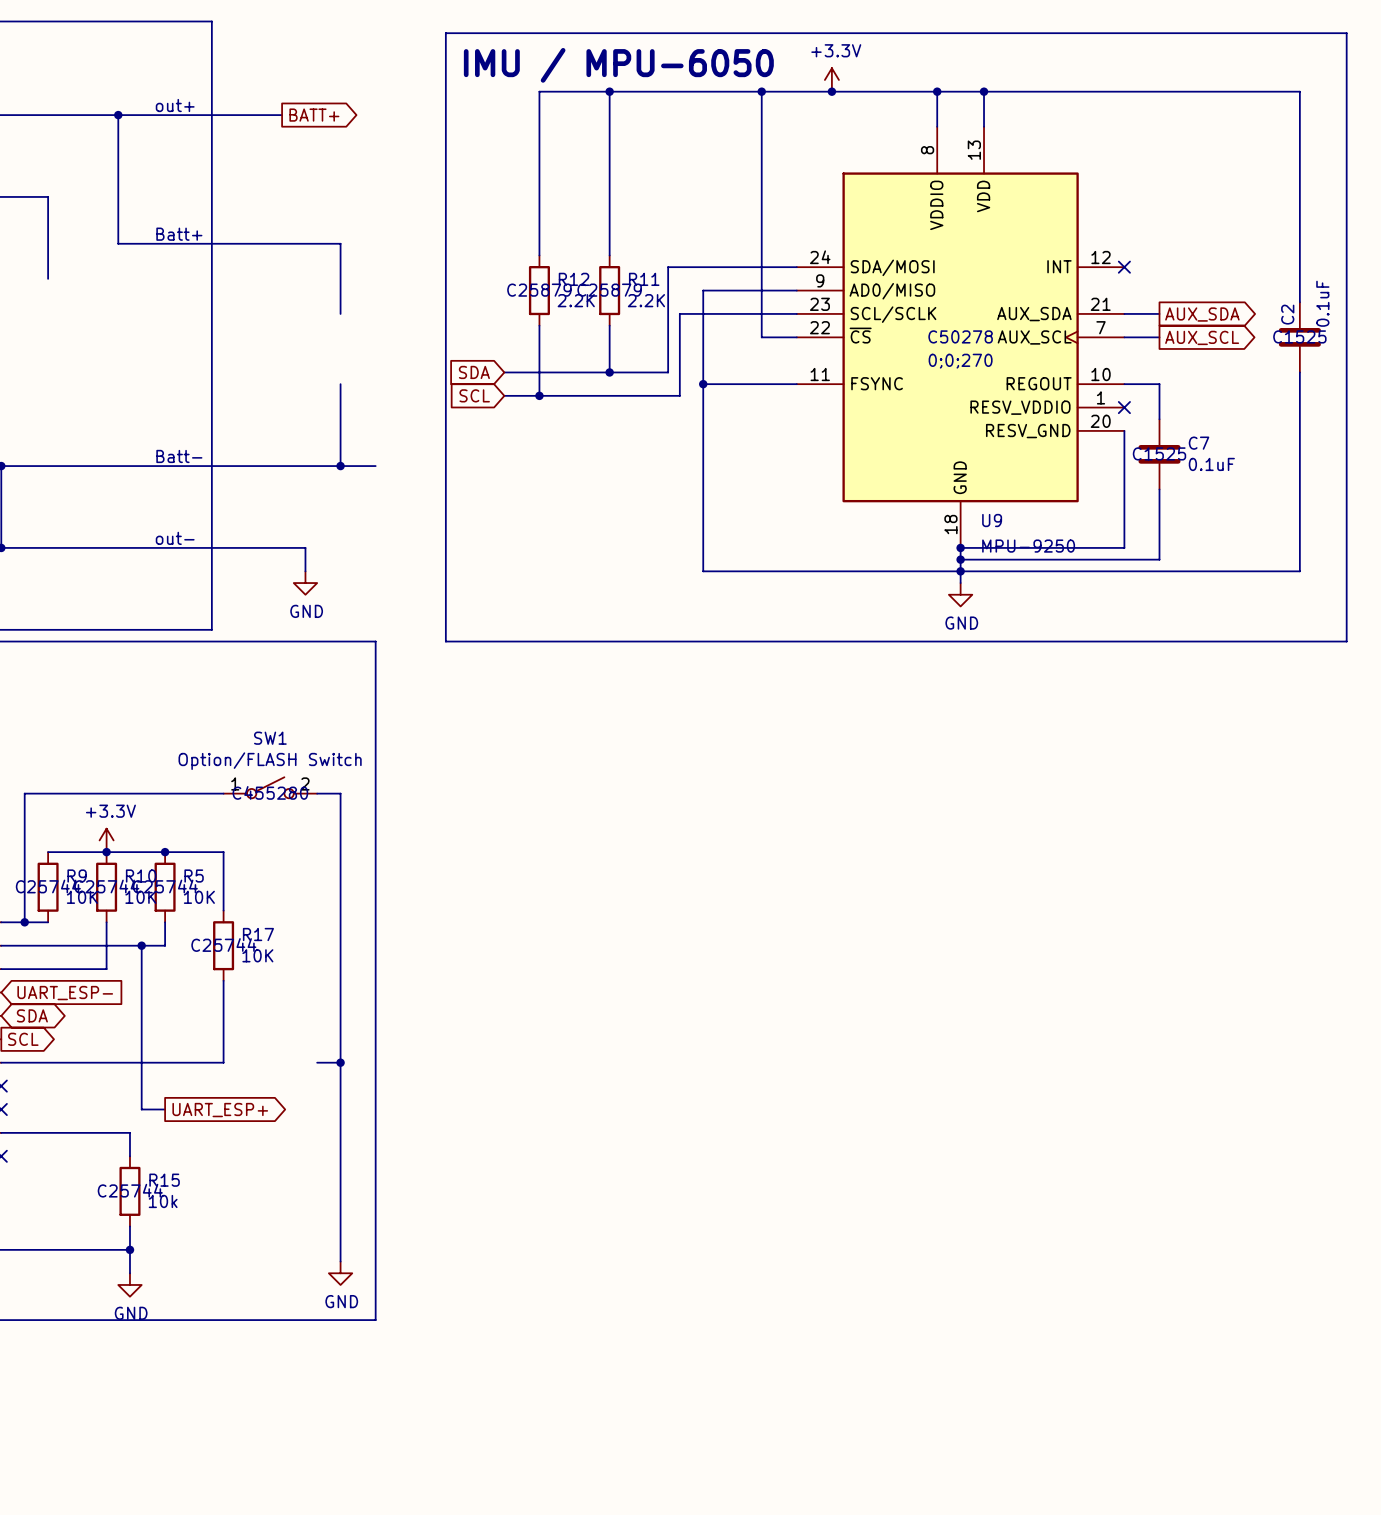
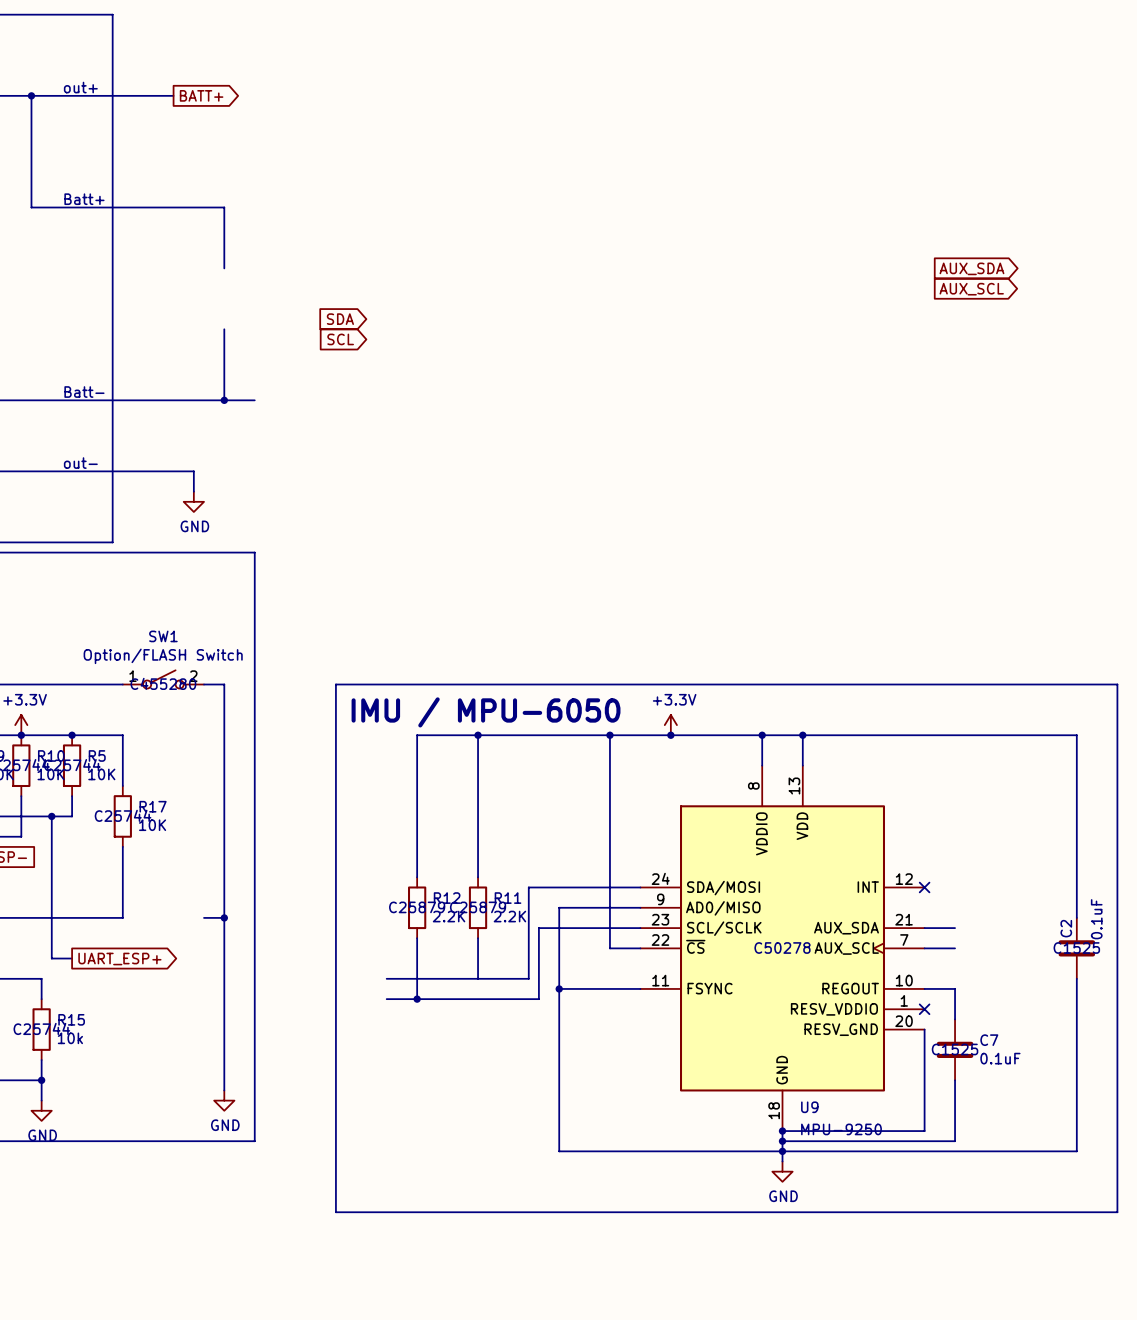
line: (445, 33) (1346, 33) (1346, 641) (445, 641) (445, 33) -> none
text: IMU / MPU-6050 (618, 65) -> none
power symbol: +3.3V (831, 79) -> none
wire: (609, 91) (609, 255) -> none
junction: (609, 91) -> none
wire: (761, 91) (761, 337) (796, 337) -> none
junction: (761, 91) -> none
junction: (831, 91) -> none
wire: (937, 91) (937, 126) -> none
junction: (937, 91) -> none
wire: (984, 91) (984, 126) -> none
junction: (984, 91) -> none
wire: (539, 255) (539, 91) (1299, 91) (1299, 302) -> none
wire: (796, 267) (668, 267) (668, 372) (504, 372) -> none
no-connect mark: (1124, 267) -> none
R12 position: (539, 290) -> (417, 907)
R11 position: (609, 290) -> (478, 907)
wire: (796, 290) (703, 290) (703, 571) (1299, 571) (1299, 372) -> none
wire: (796, 313) (679, 313) (679, 395) (504, 395) -> none
wire: (1124, 313) (1159, 313) -> none
wire: (539, 325) (539, 395) -> none
wire: (609, 325) (609, 372) -> none
U9 position: (960, 337) -> (782, 948)
wire: (1124, 337) (1159, 337) -> none
C2 position: (1299, 337) -> (1076, 948)
U9 text: 0;0;270 (960, 361) -> none
junction: (609, 372) -> none
wire: (703, 384) (796, 384) -> none
junction: (703, 384) -> none
wire: (1124, 384) (1159, 384) (1159, 419) -> none
junction: (539, 395) -> none
no-connect mark: (1124, 407) -> none
wire: (1124, 430) (1124, 547) (960, 547) (960, 583) -> none
C7 position: (1159, 454) -> (955, 1049)
wire: (1159, 489) (1159, 559) (960, 559) -> none
junction: (960, 547) -> none
junction: (960, 559) -> none
junction: (960, 571) -> none
power symbol: GND (960, 594) -> none
line: none -> (335, 684) (1117, 684) (1117, 1212) (335, 1212) (335, 684)
text: none -> IMU / MPU-6050 (486, 712)
power symbol: none -> +3.3V (670, 725)
wire: none -> (478, 735) (478, 877)
junction: none -> (478, 735)
wire: none -> (609, 735) (609, 948) (640, 948)
junction: none -> (609, 735)
junction: none -> (670, 735)
wire: none -> (762, 735) (762, 765)
junction: none -> (762, 735)
wire: none -> (802, 735) (802, 765)
junction: none -> (802, 735)
wire: none -> (417, 877) (417, 735) (1076, 735) (1076, 917)
wire: none -> (640, 887) (528, 887) (528, 978) (386, 978)
no-connect mark: none -> (924, 887)
wire: none -> (640, 907) (559, 907) (559, 1151) (1076, 1151) (1076, 978)
wire: none -> (640, 928) (538, 928) (538, 999) (386, 999)
wire: none -> (924, 928) (955, 928)
wire: none -> (417, 938) (417, 999)
wire: none -> (478, 938) (478, 978)
wire: none -> (924, 948) (955, 948)
wire: none -> (559, 988) (640, 988)
junction: none -> (559, 988)
wire: none -> (924, 988) (955, 988) (955, 1019)
junction: none -> (417, 999)
no-connect mark: none -> (924, 1009)
wire: none -> (924, 1029) (924, 1131) (782, 1131) (782, 1161)
wire: none -> (955, 1080) (955, 1141) (782, 1141)
junction: none -> (782, 1131)
junction: none -> (782, 1141)
junction: none -> (782, 1151)
power symbol: none -> GND (782, 1171)

